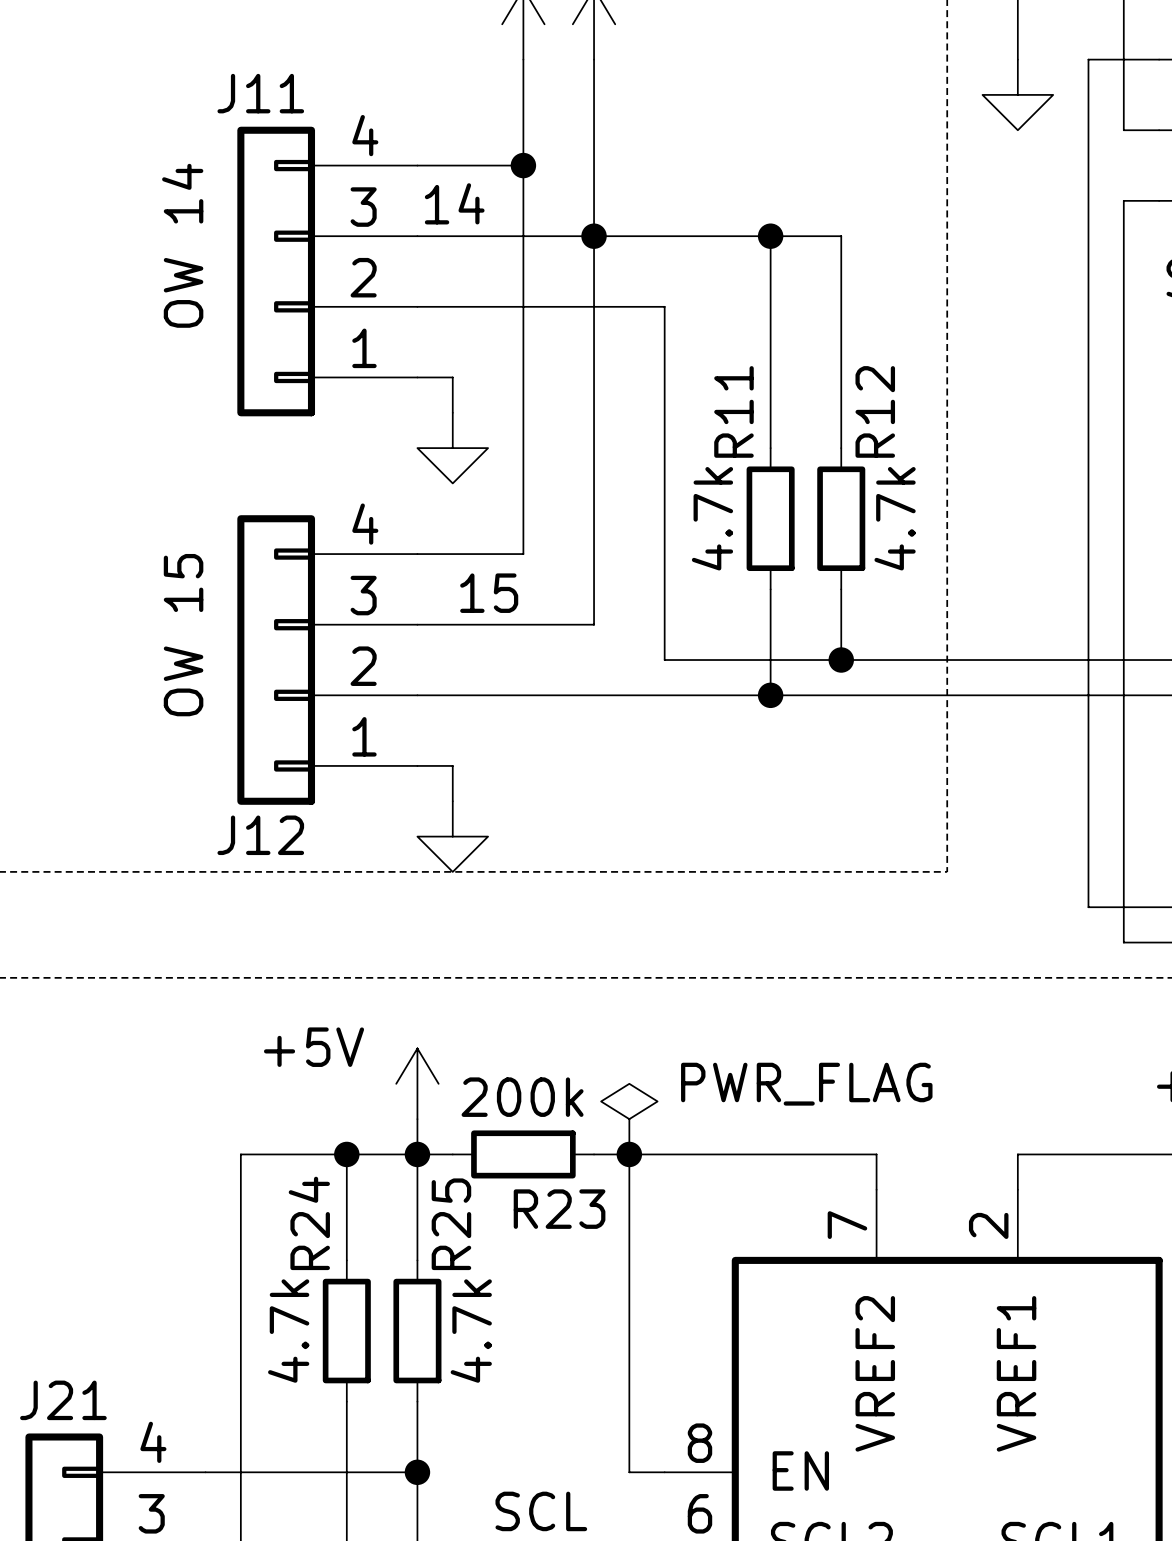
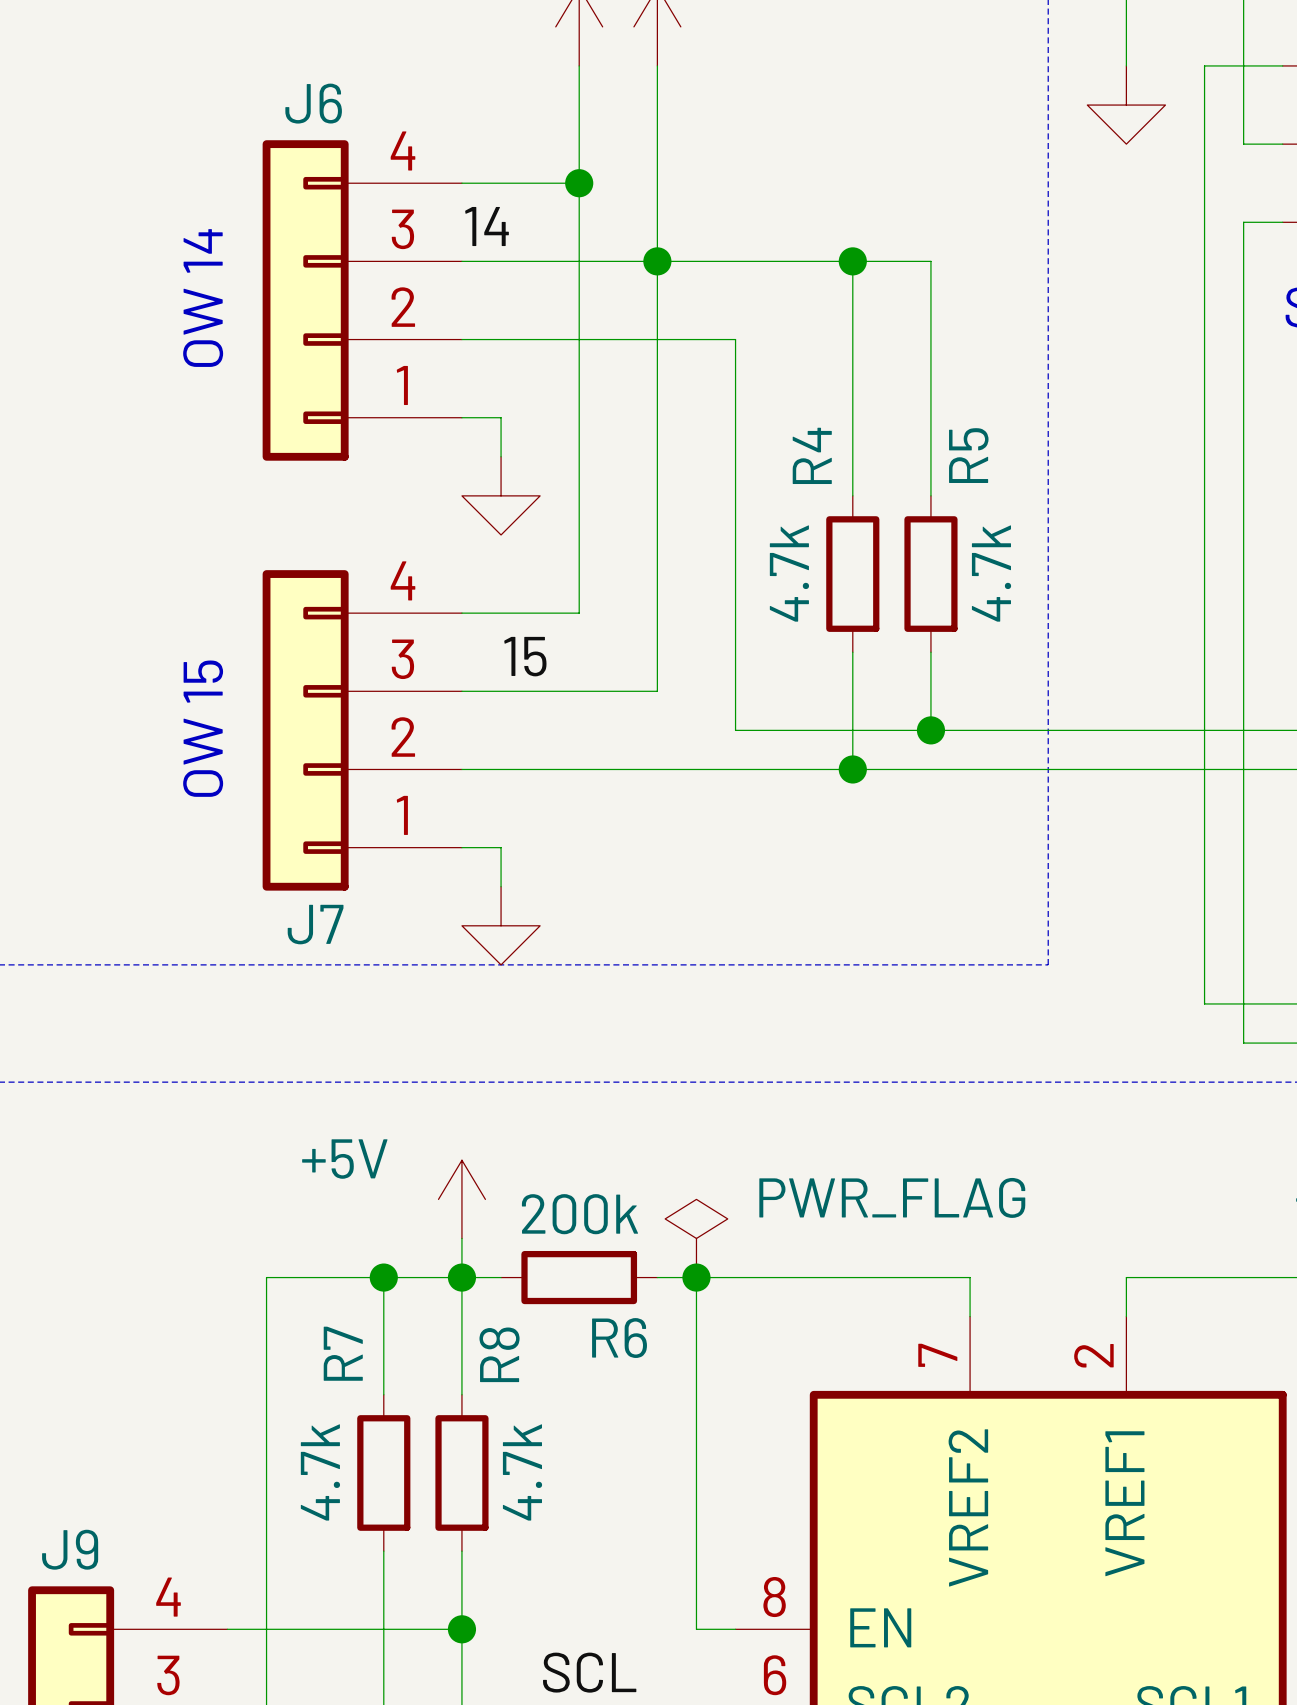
J11 name: J11 (260, 93) -> J6 (313, 103)
R11 name: R11 (733, 411) -> R4 (812, 455)
R12 name: R12 (875, 411) -> R5 (968, 455)
J12 name: J12 (260, 835) -> J7 (315, 924)
R23 name: R23 (559, 1209) -> R6 (619, 1338)
R24 name: R24 (309, 1223) -> R7 (343, 1353)
R25 name: R25 (451, 1224) -> R8 (499, 1354)
J21 name: J21 (63, 1400) -> J9 (70, 1549)

